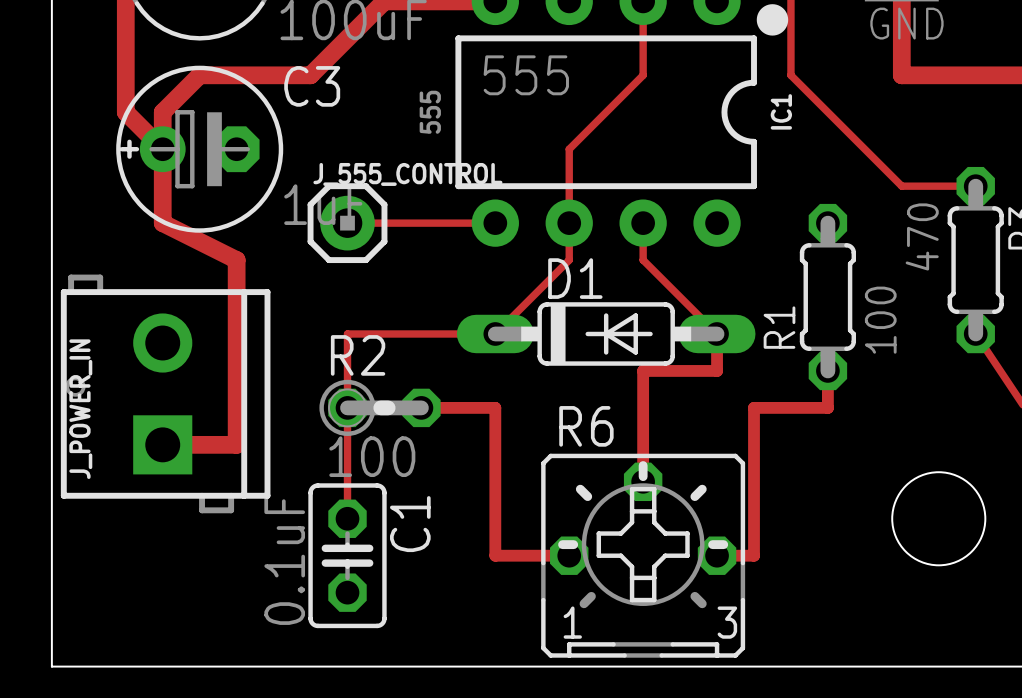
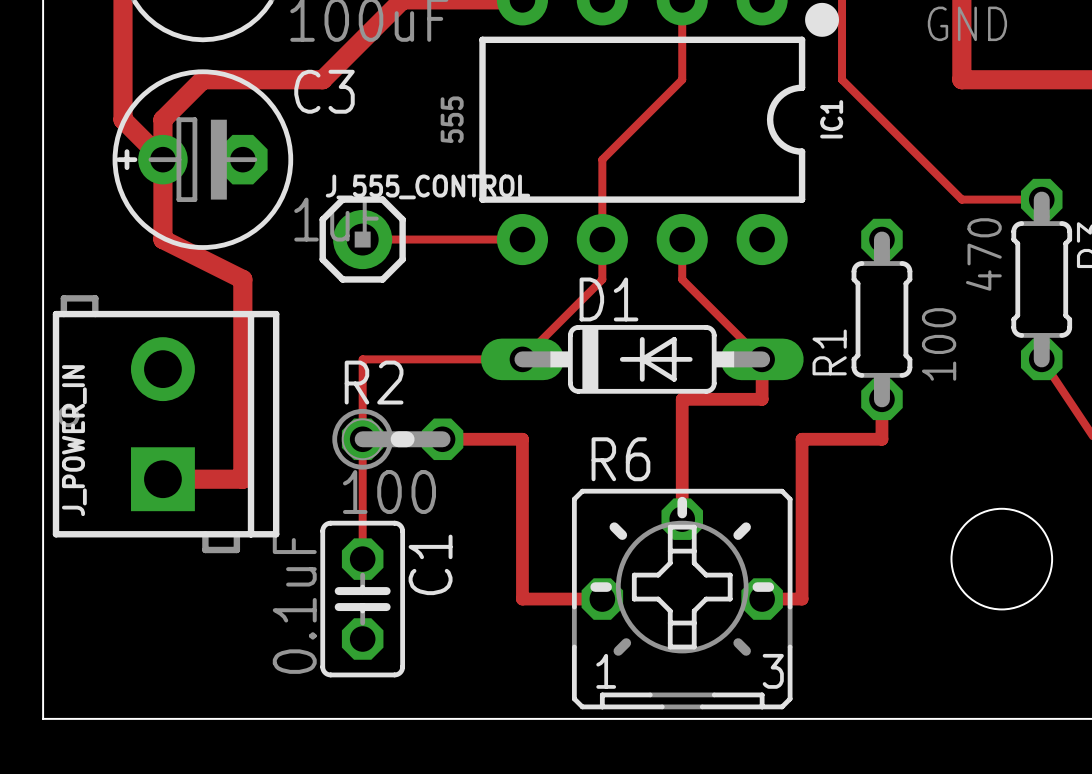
text: 555 (526, 75) -> none

